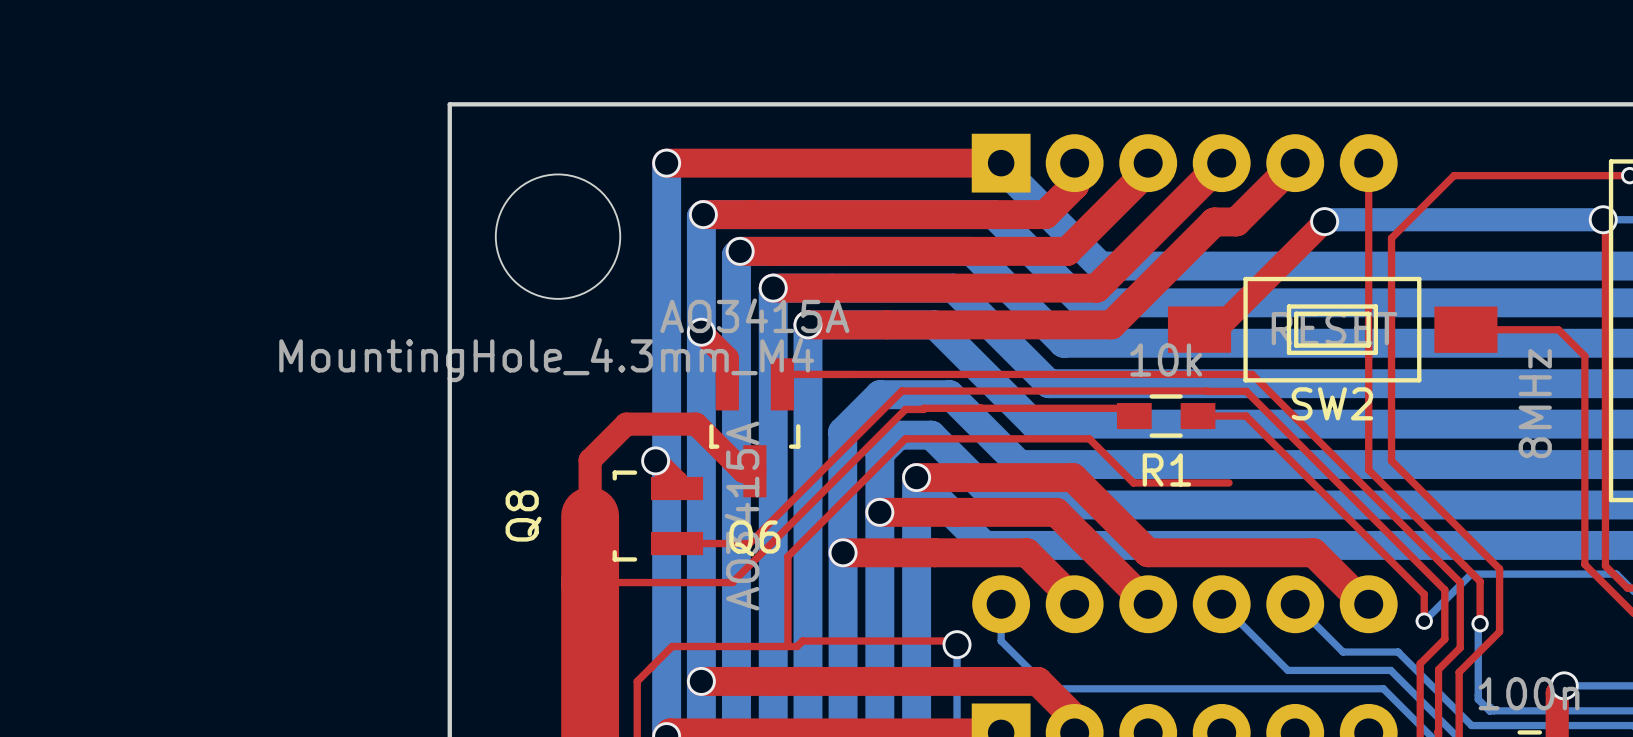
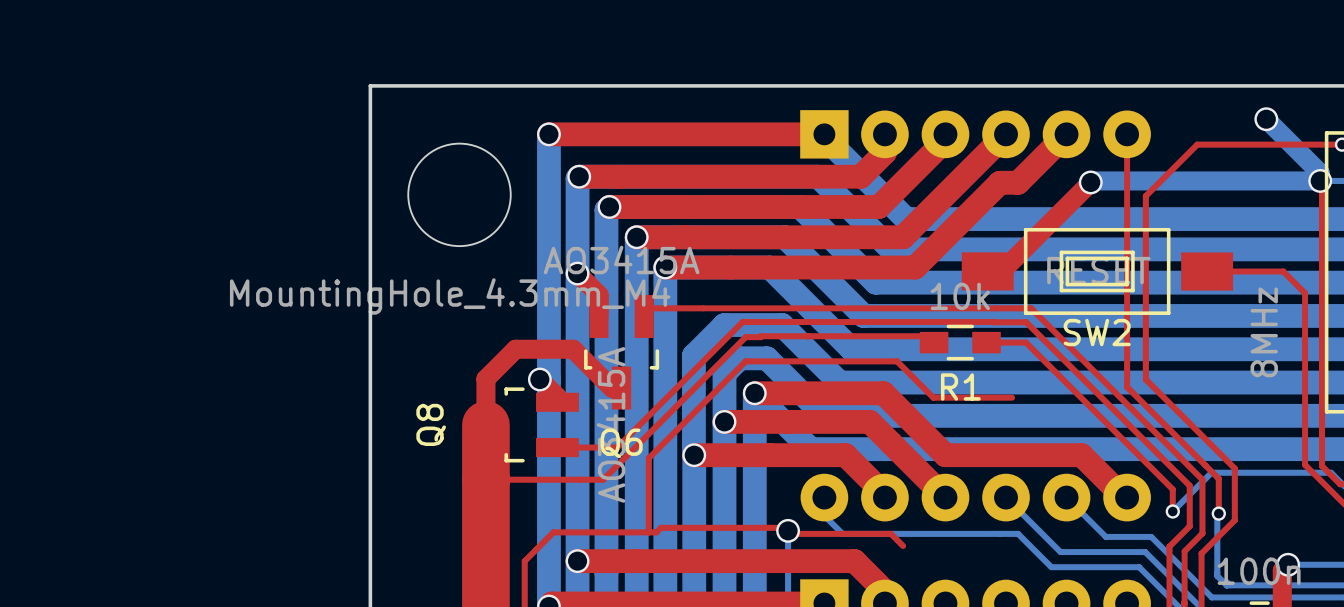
bottom track: none -> (1266, 119) (1320, 173) (1320, 180)
via: none -> (1266, 119)
bottom track: (1001, 626) (1001, 641) (1048, 688) (1276, 688) -> (824, 515) (842, 533) (1018, 533) (1051, 567)
top track: none -> (788, 530) (791, 533) (890, 533) (903, 546)

